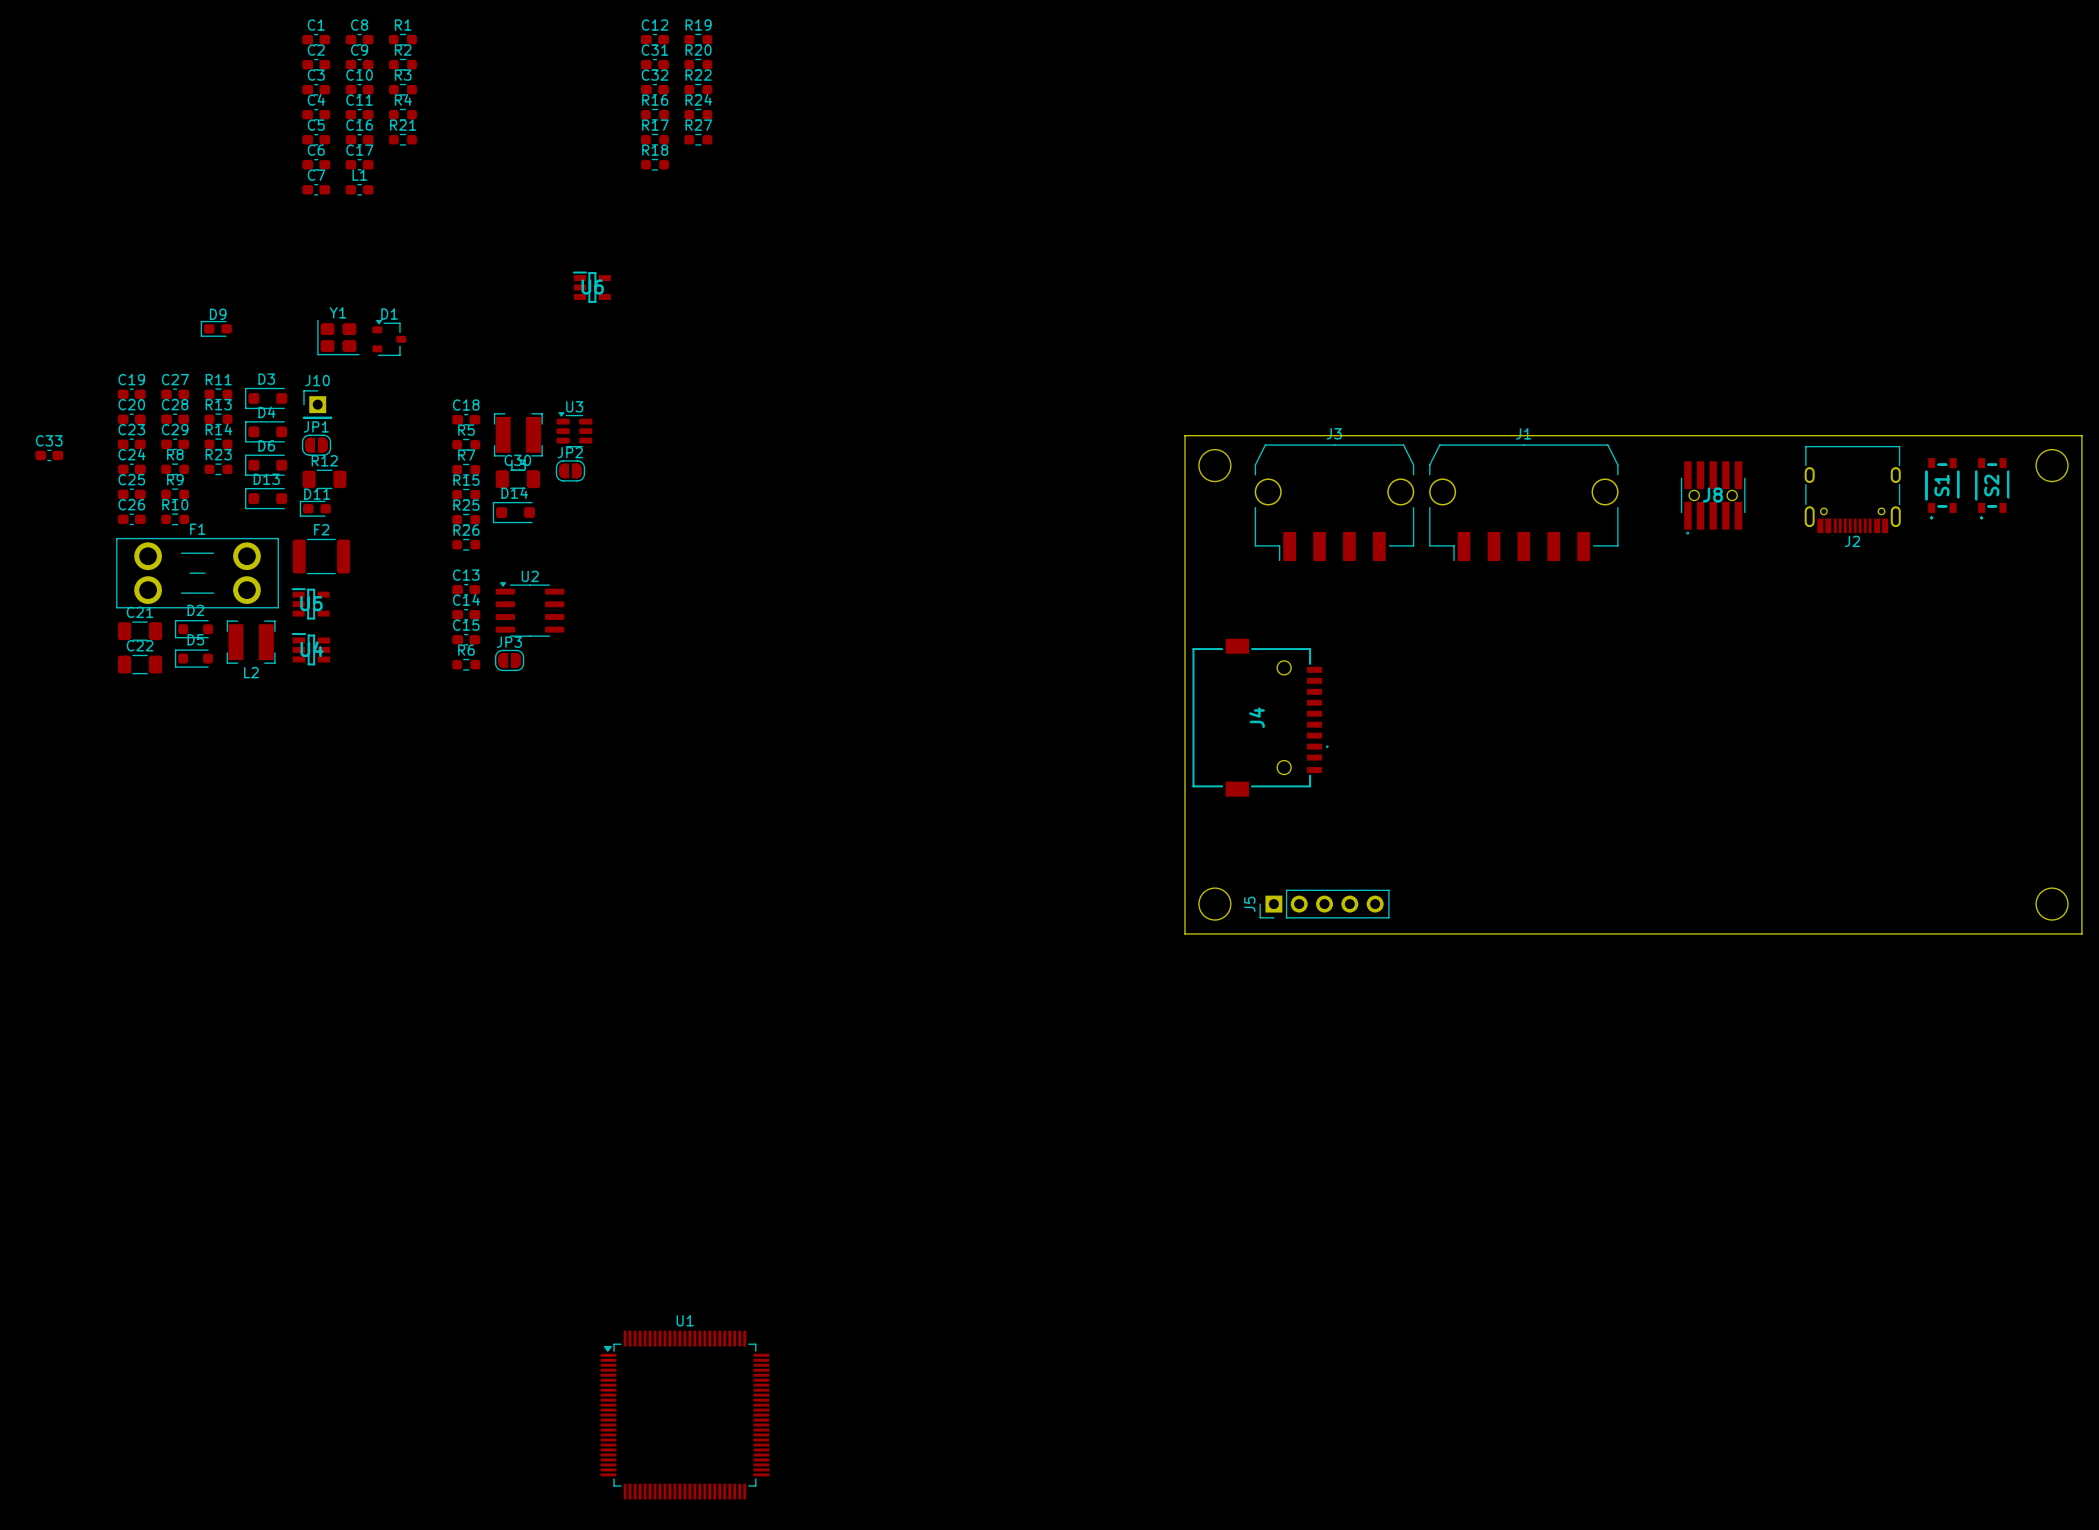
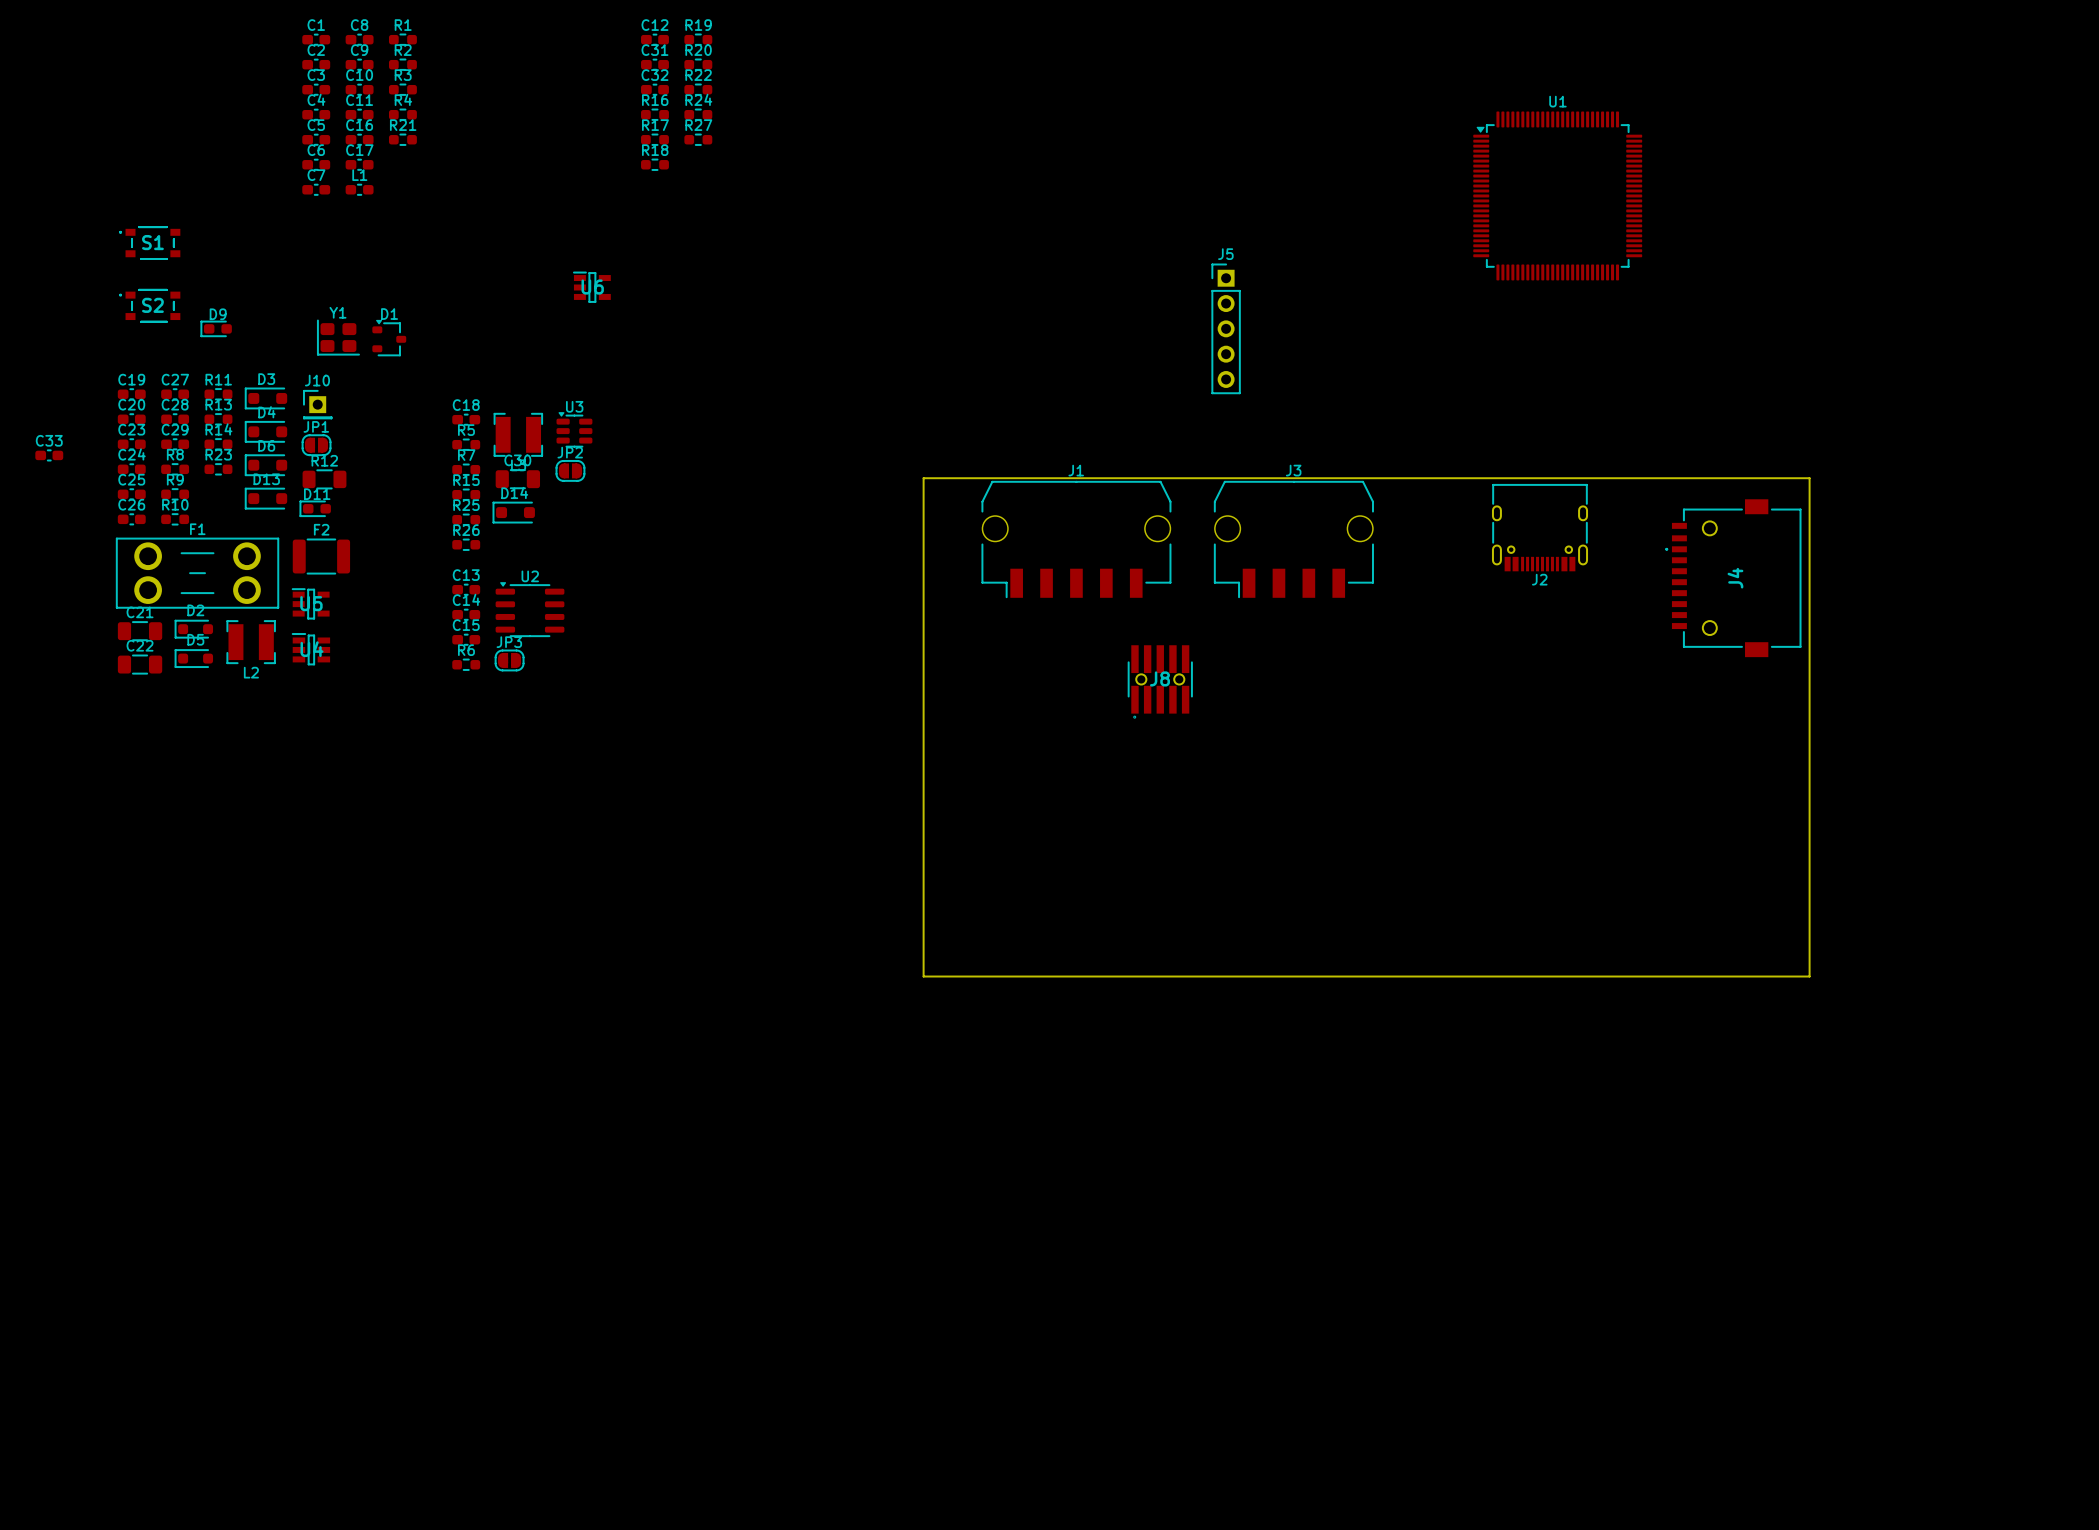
board edge: (1184, 435) (2081, 435) (2081, 933) (1184, 933) (1184, 435) -> none
round board edge: [1198, 449, 1232, 482] -> none
round board edge: [2035, 449, 2069, 482] -> none
board edge: none -> (923, 478) (1809, 478) (1809, 976) (923, 976) (923, 478)
S1 rotation: 0° (1942, 488) -> 90° clockwise (149, 243)
S1 position: (1942, 488) -> (149, 243)
S2 rotation: 0° (1992, 488) -> 90° clockwise (149, 305)
S2 position: (1992, 488) -> (149, 305)
J2 position: (1852, 489) -> (1540, 527)
J8 position: (1713, 497) -> (1160, 681)
J3 position: (1334, 502) -> (1293, 539)
J1 position: (1523, 502) -> (1076, 539)
J4 rotation: 0° (1260, 717) -> 180° (1733, 578)
J4 position: (1260, 717) -> (1733, 578)
round board edge: [1198, 887, 1232, 921] -> none
round board edge: [2035, 887, 2069, 921] -> none
J5 rotation: 0° (1324, 904) -> 90° clockwise (1226, 328)
J5 position: (1324, 904) -> (1226, 328)
U1 position: (684, 1415) -> (1557, 195)

